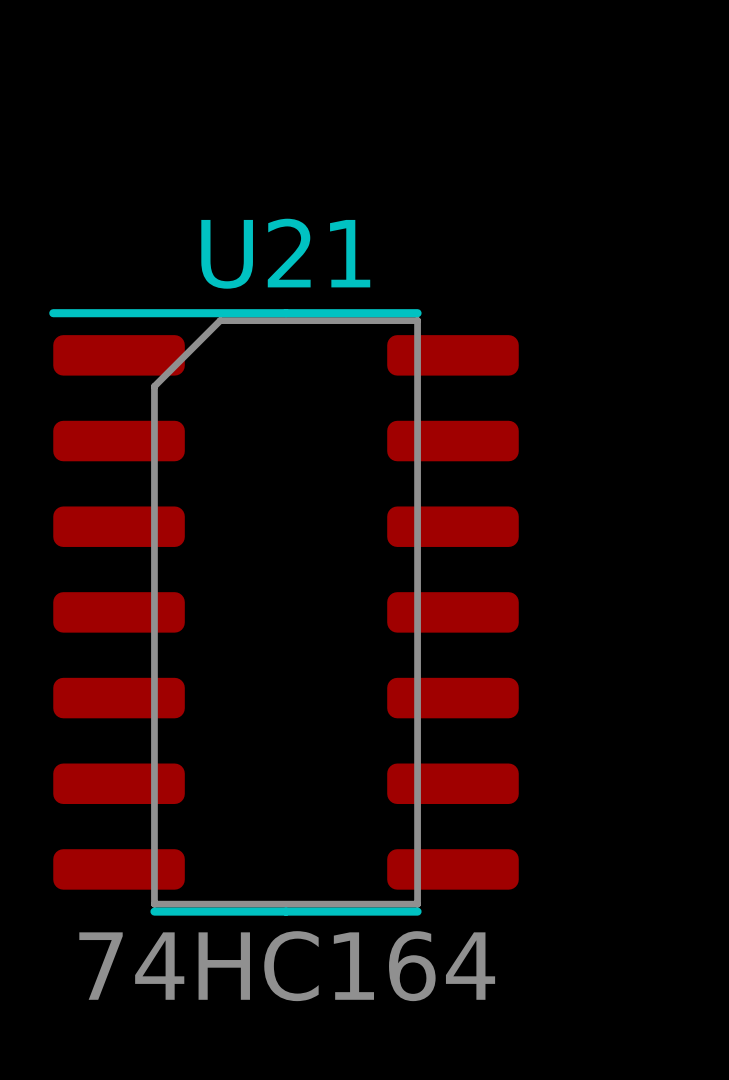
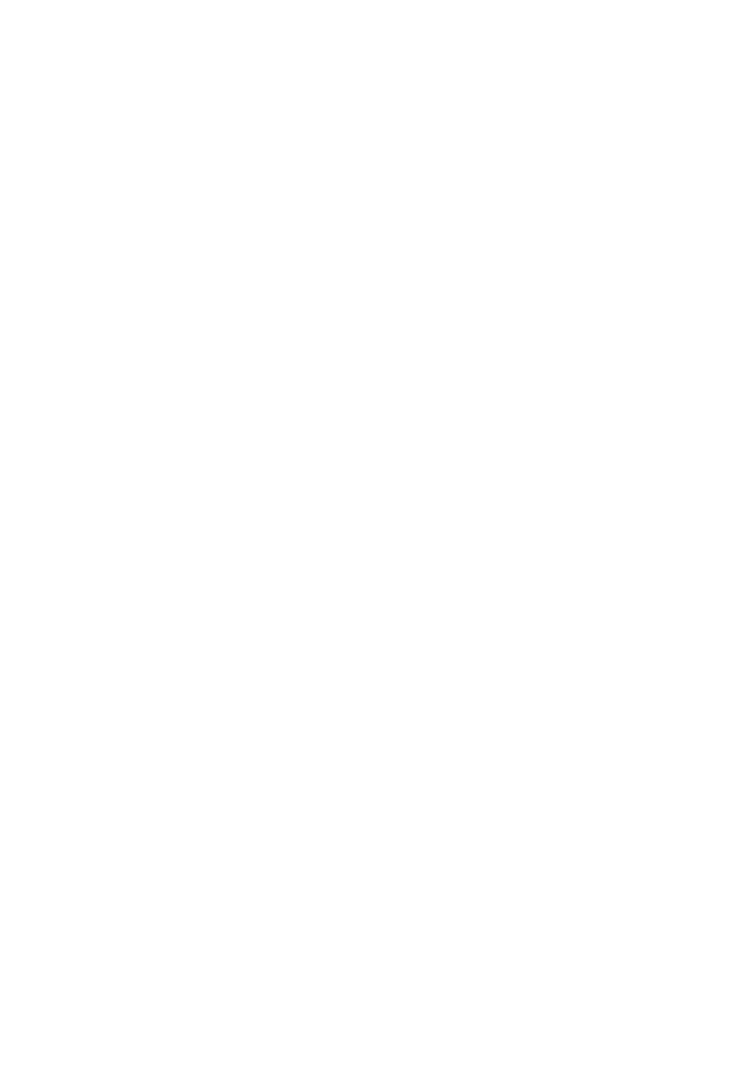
U21: 74HC164 (283, 612) -> none

